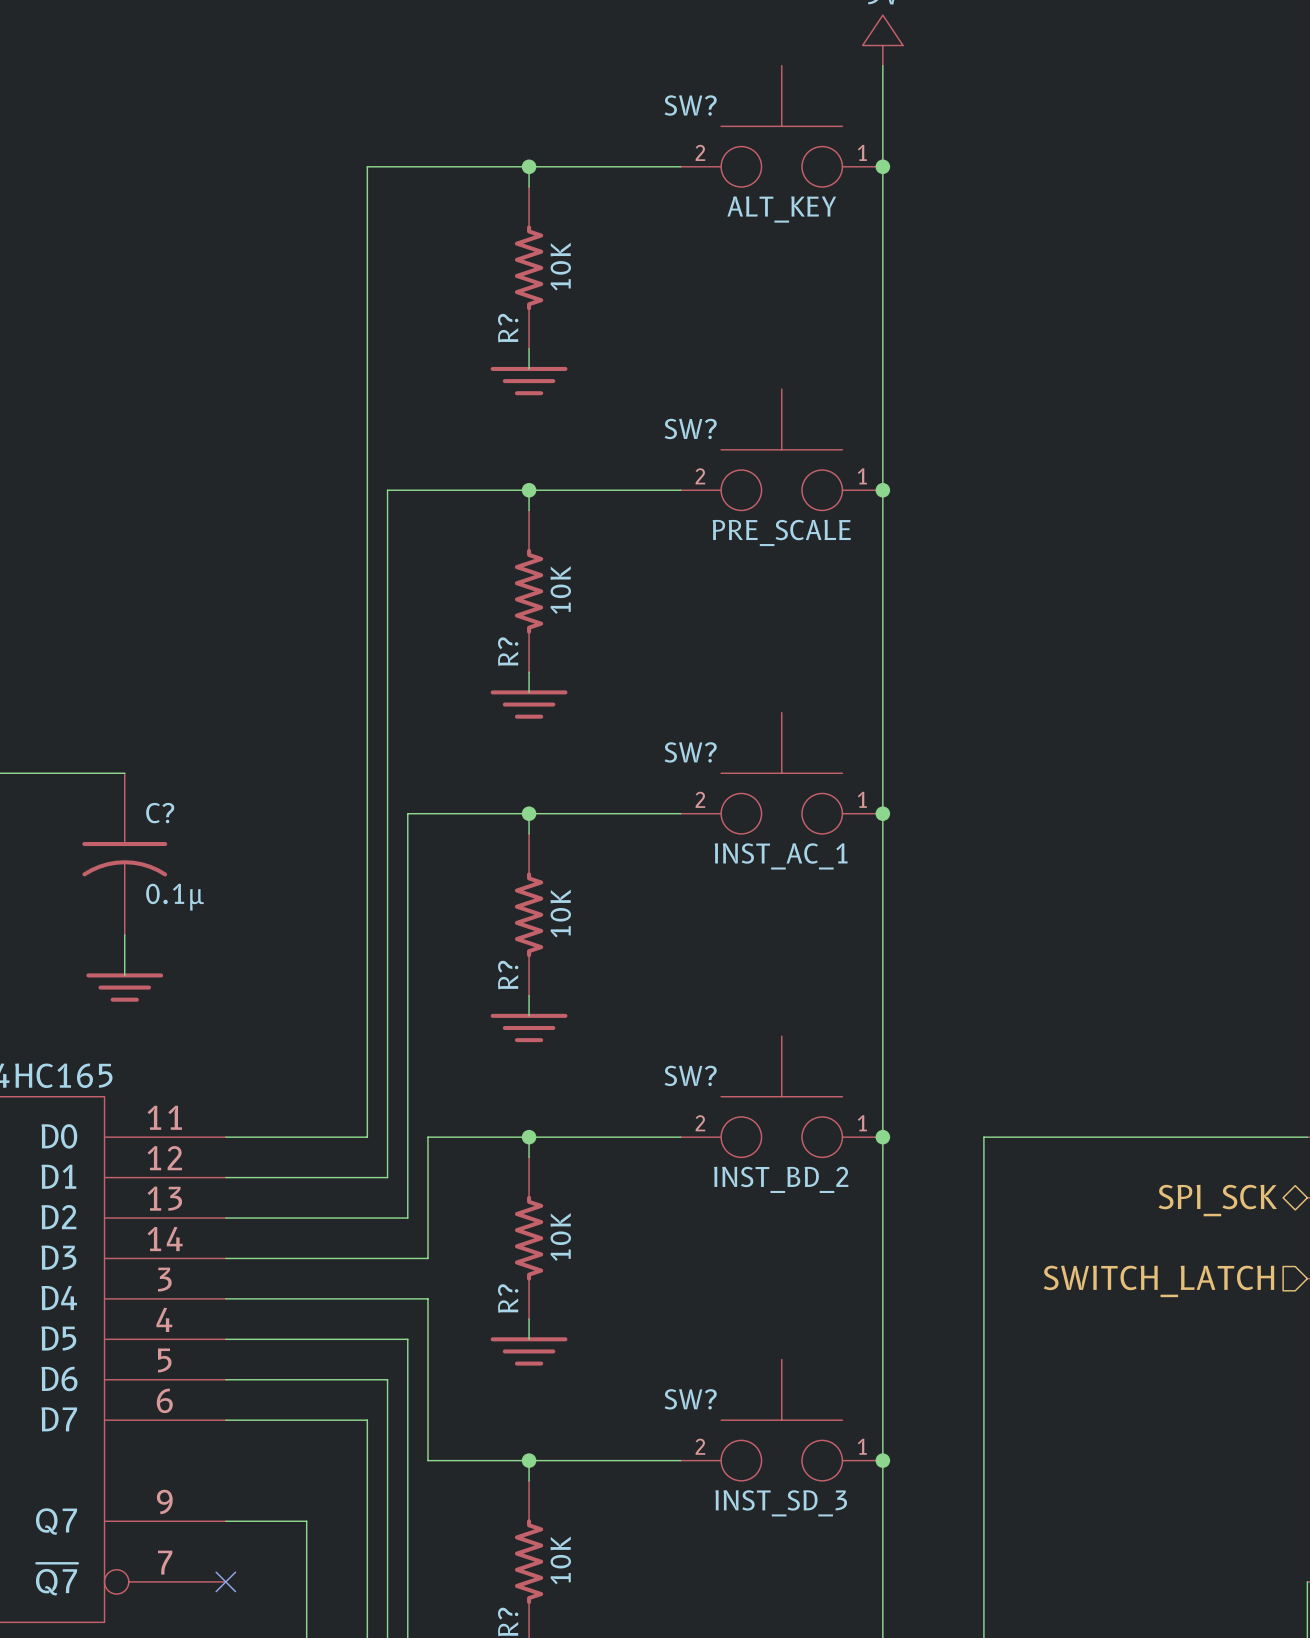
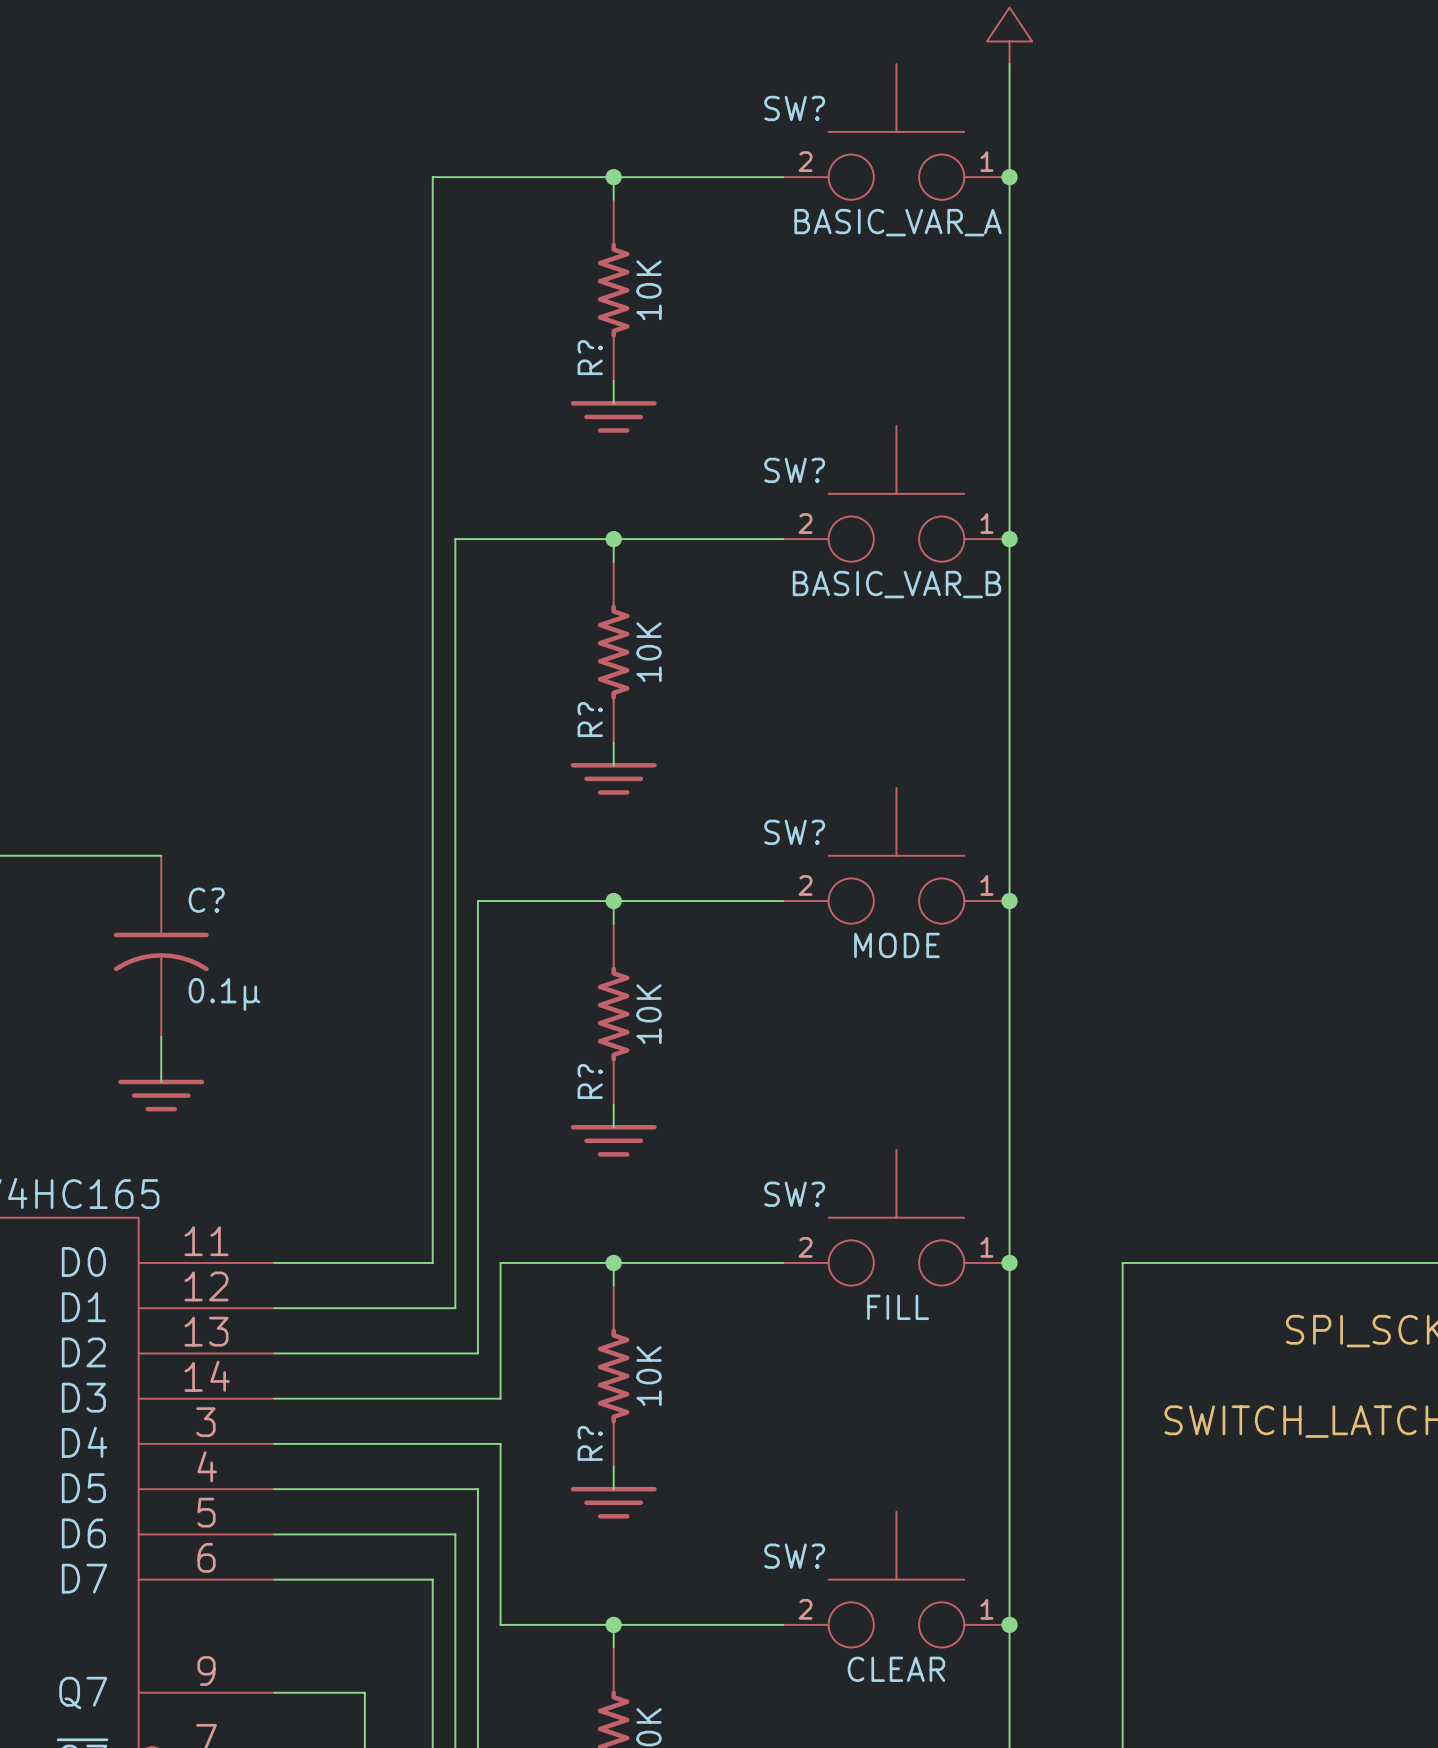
SW? value: ALT_KEY (781, 209) -> BASIC_VAR_A (898, 222)
SW? value: PRE_SCALE (781, 532) -> BASIC_VAR_B (896, 584)
SW? value: INST_AC_1 (781, 856) -> MODE (896, 945)
SW? value: INST_BD_2 (781, 1179) -> FILL (898, 1307)
SW? value: INST_SD_3 (781, 1503) -> CLEAR (896, 1669)

